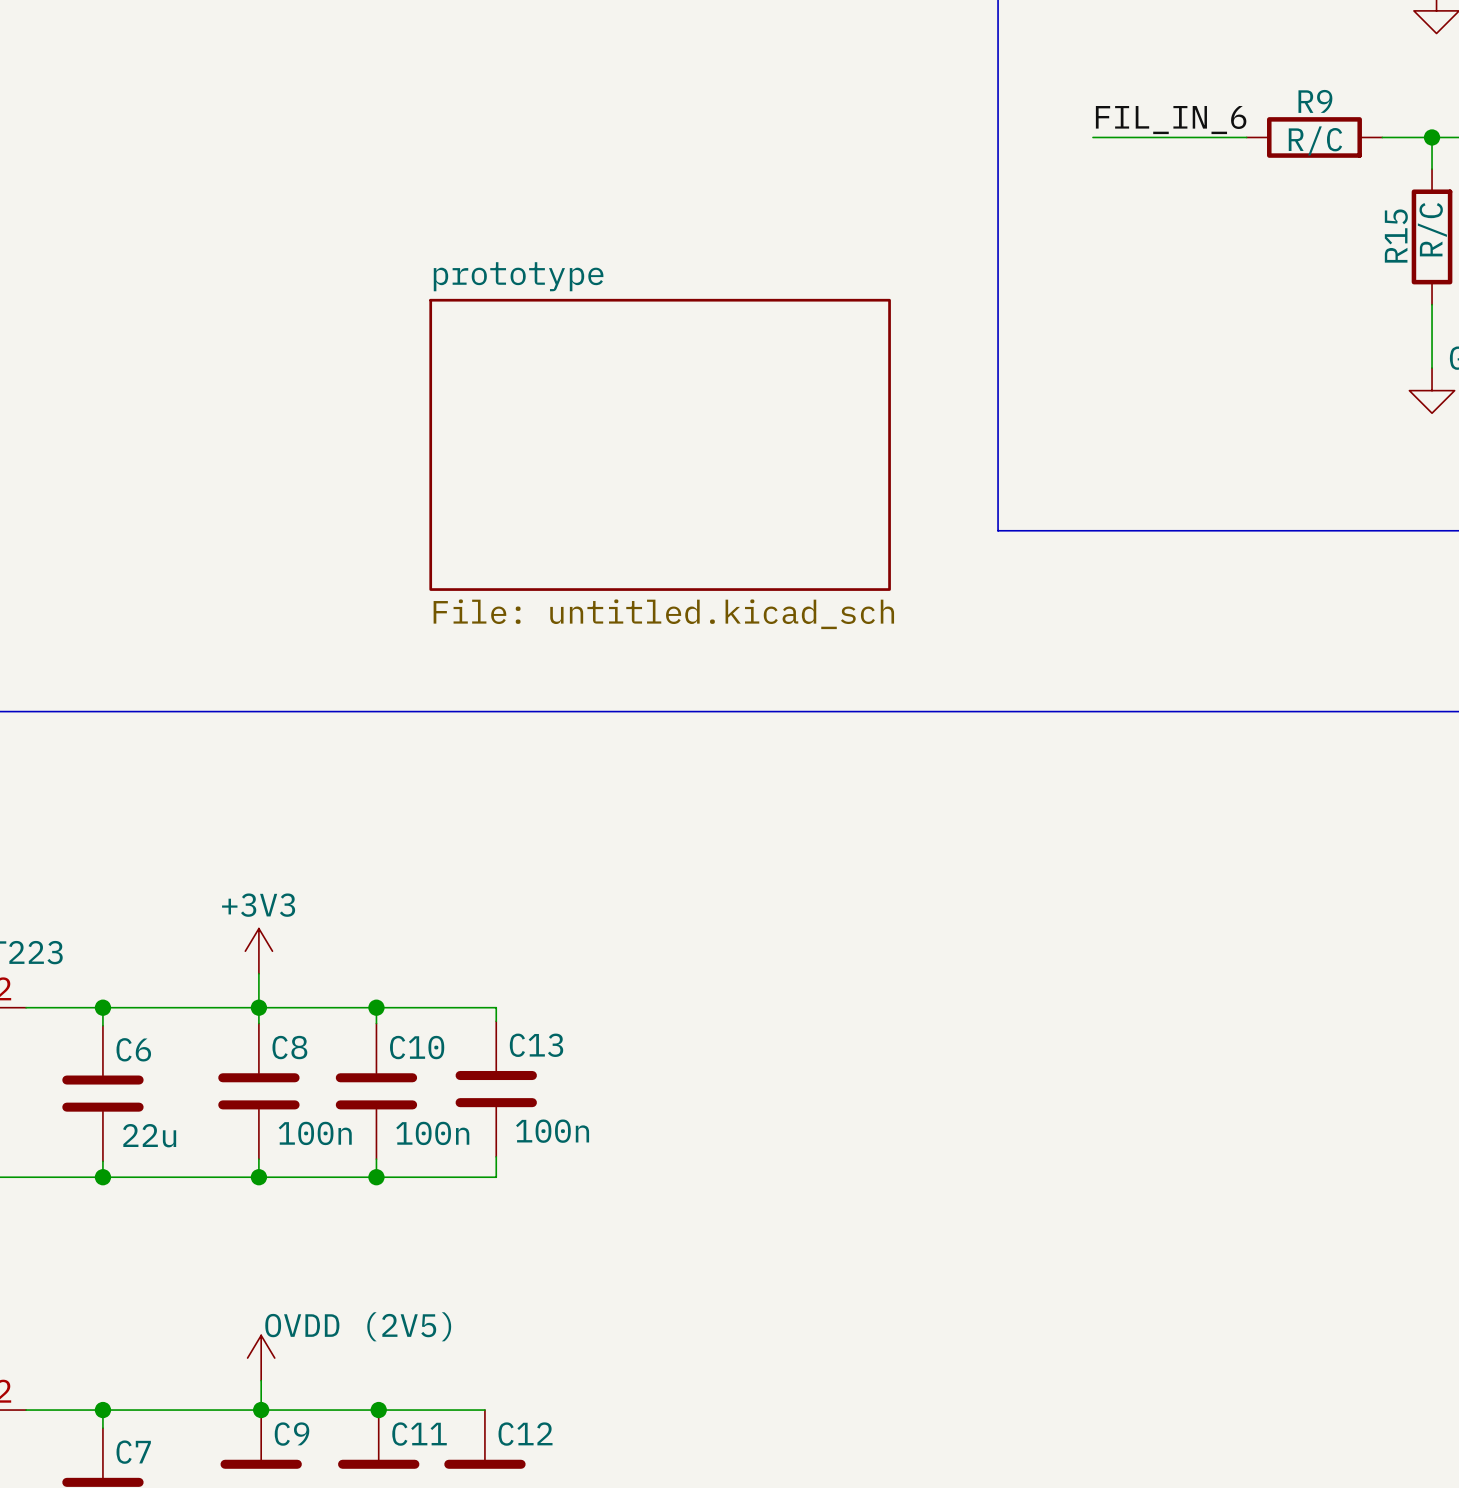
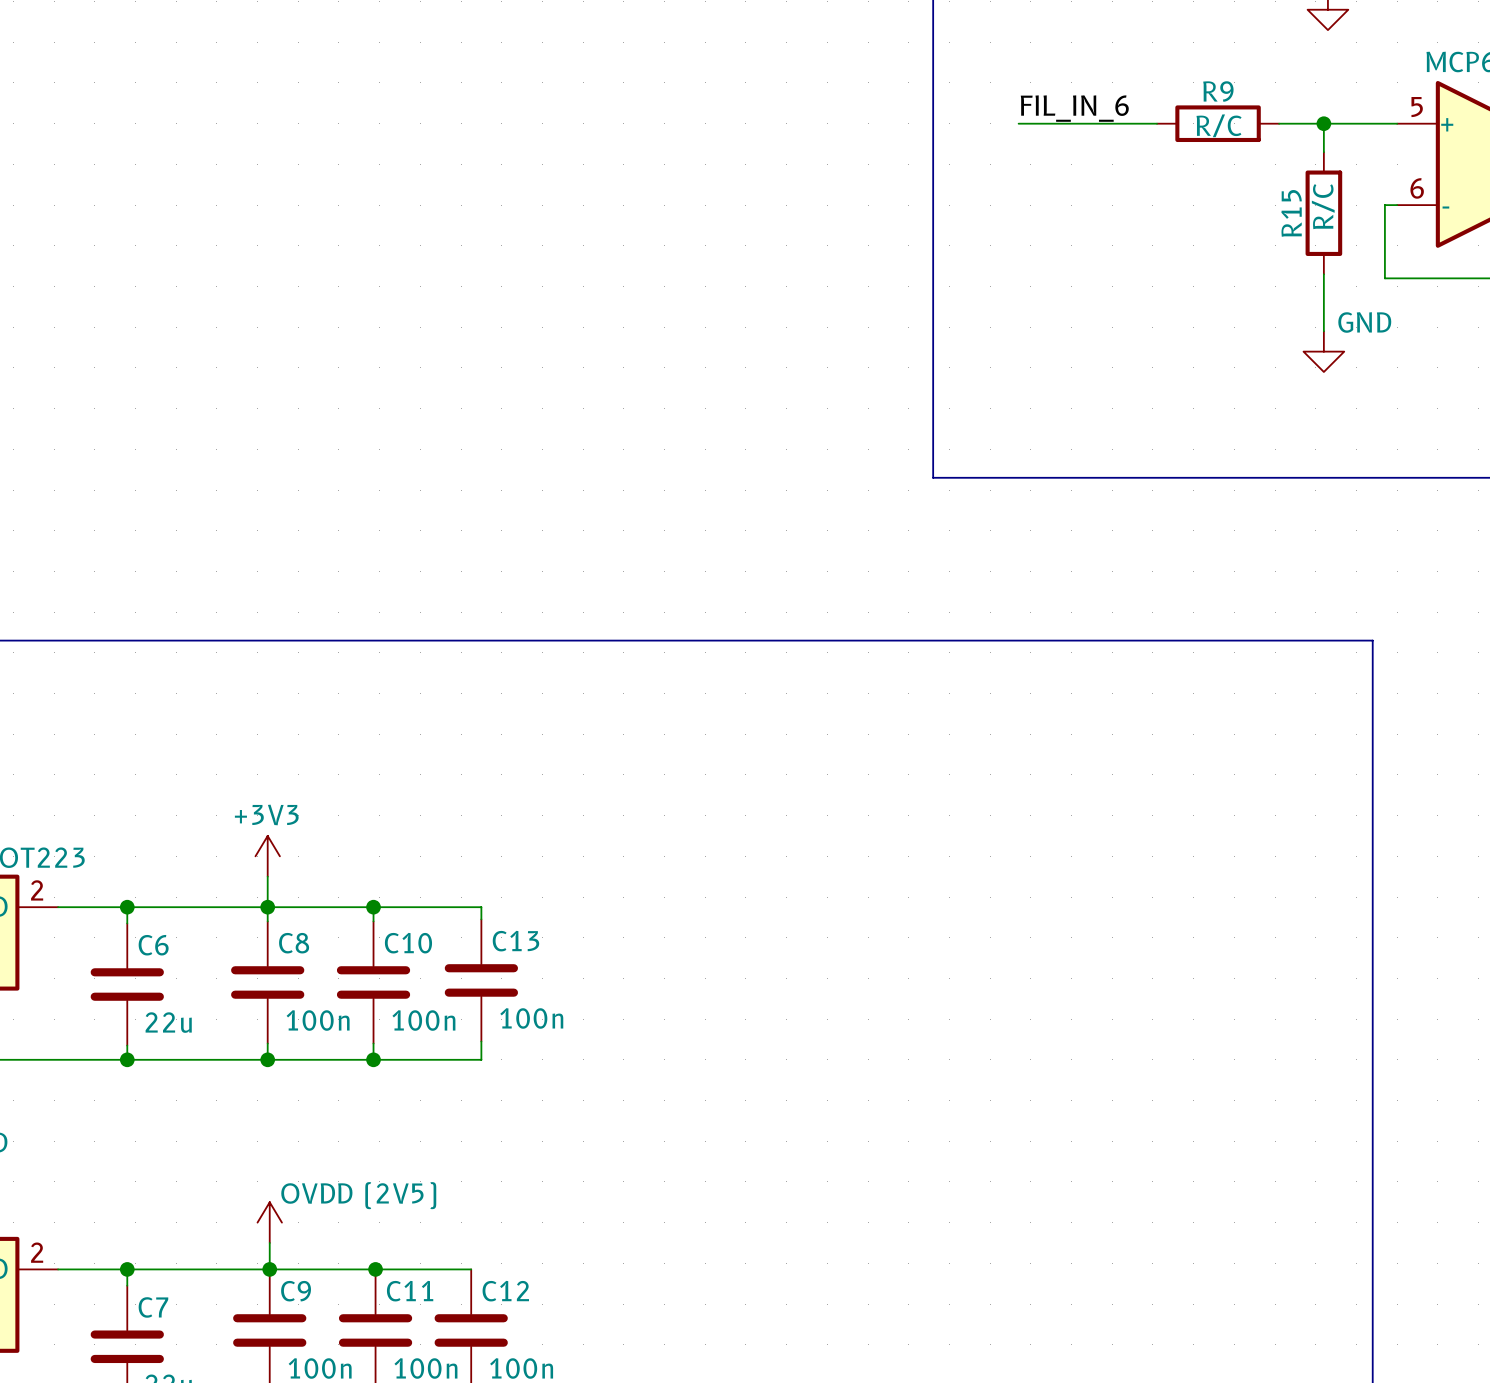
sheet prototype: File: untitled.kicad_sch (660, 444) -> none

